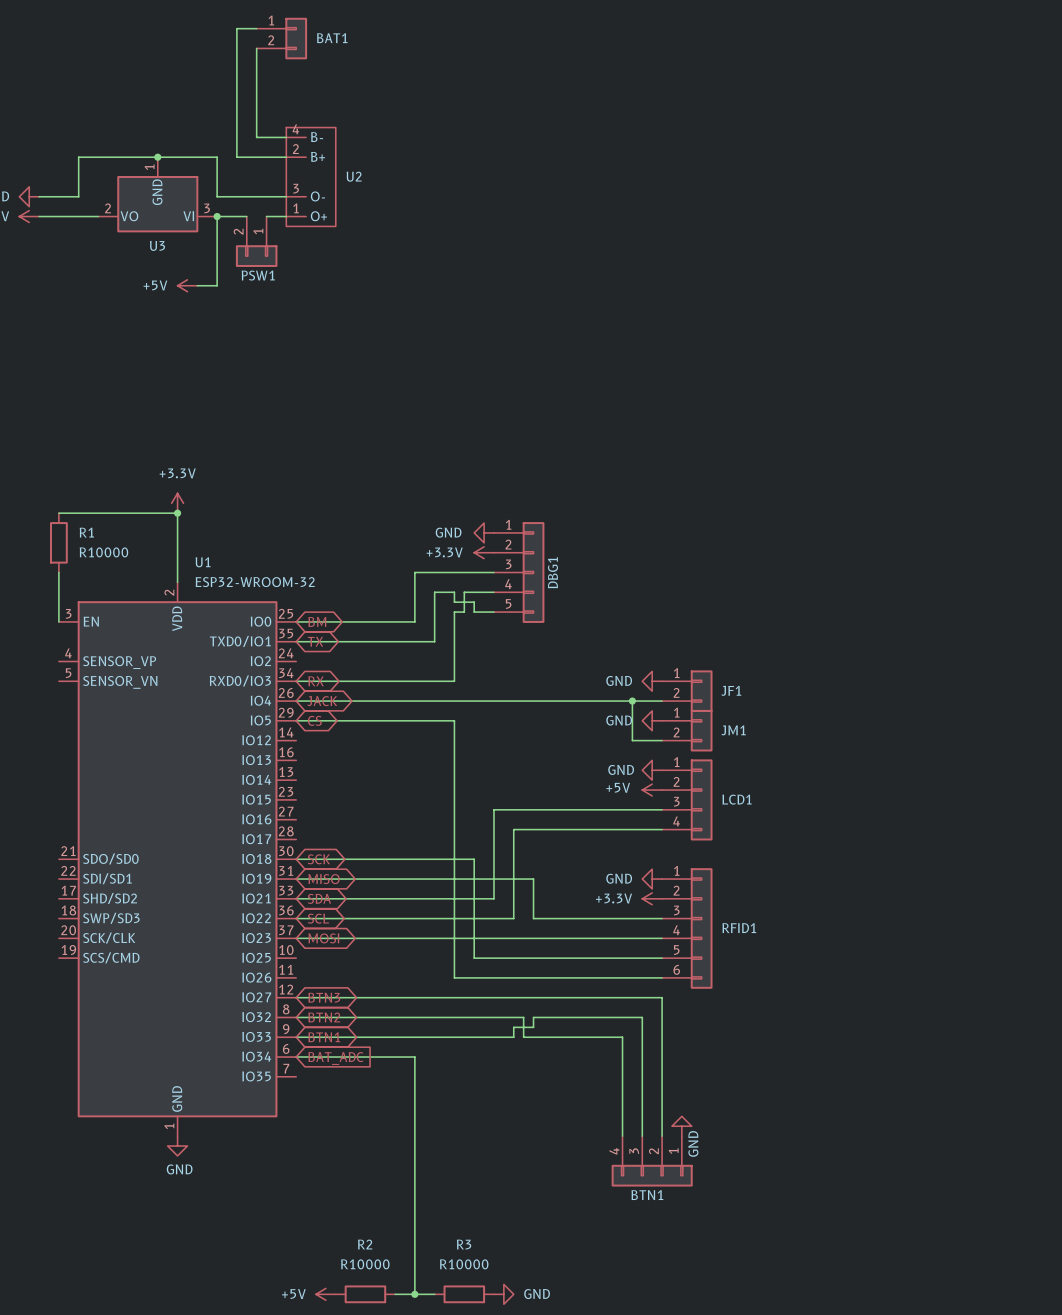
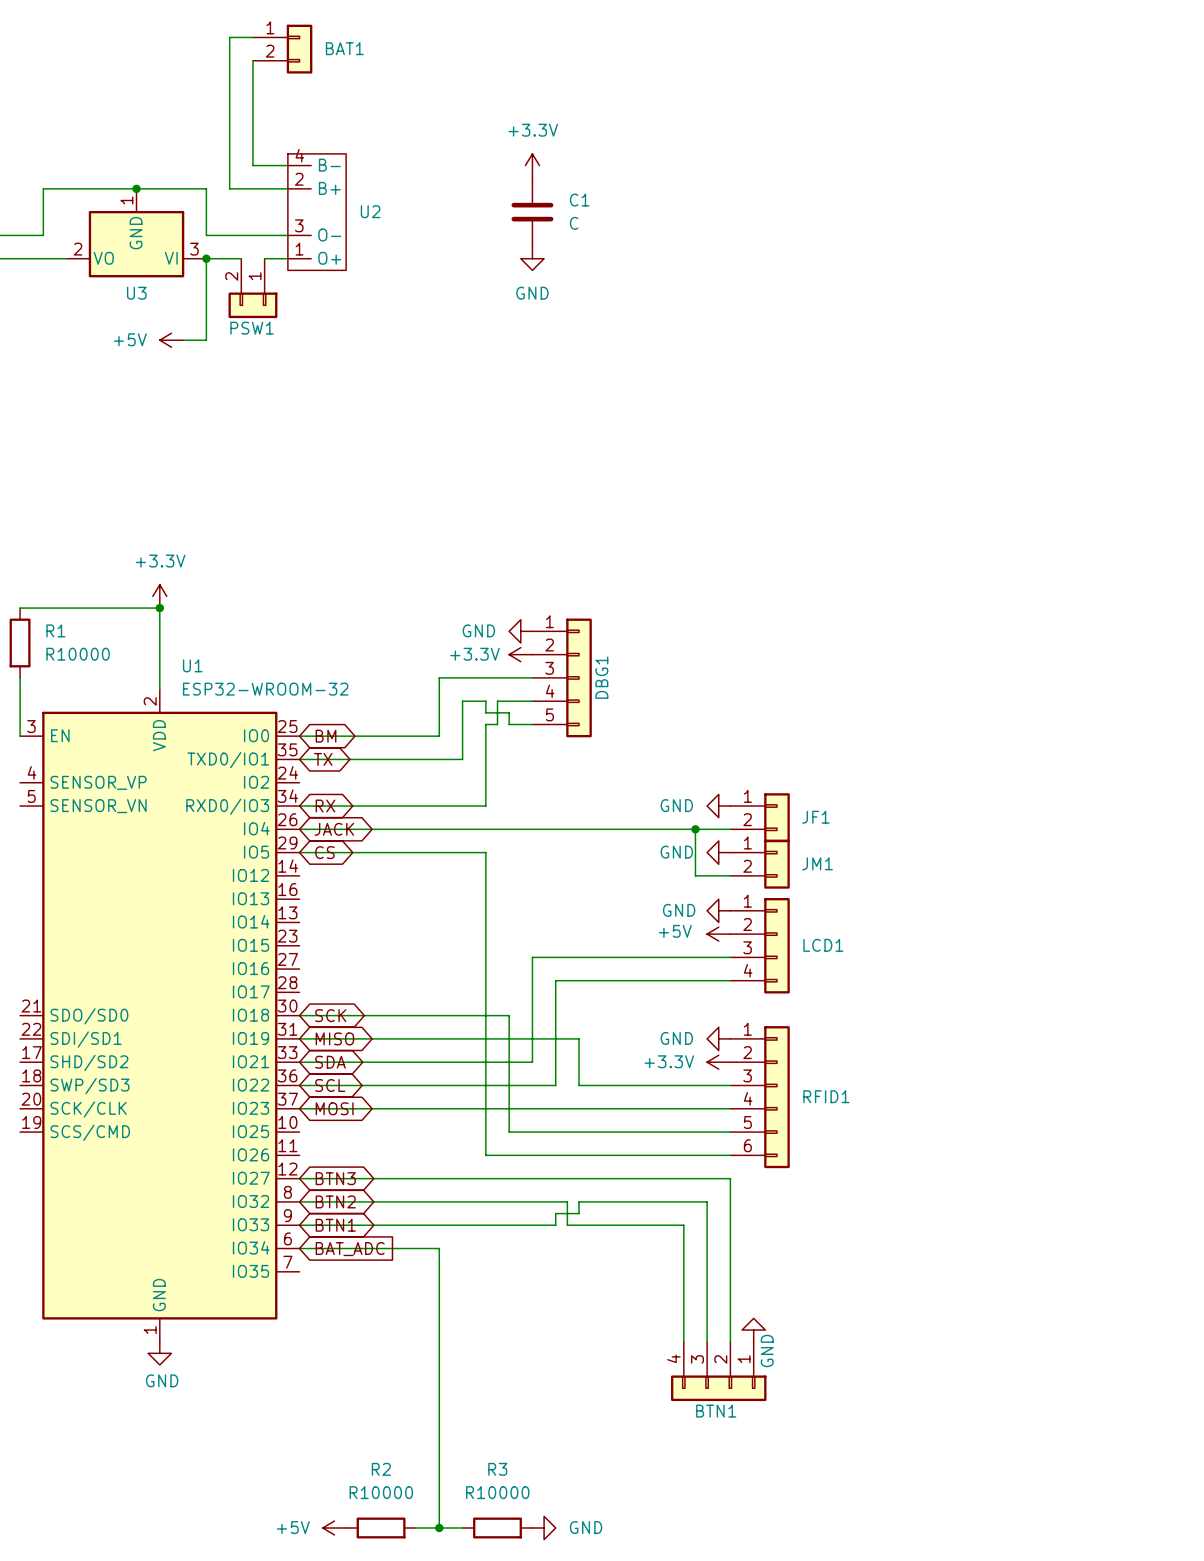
power symbol: none -> +3.3V (532, 165)
C1: none -> C (532, 212)
power symbol: none -> GND (532, 258)

